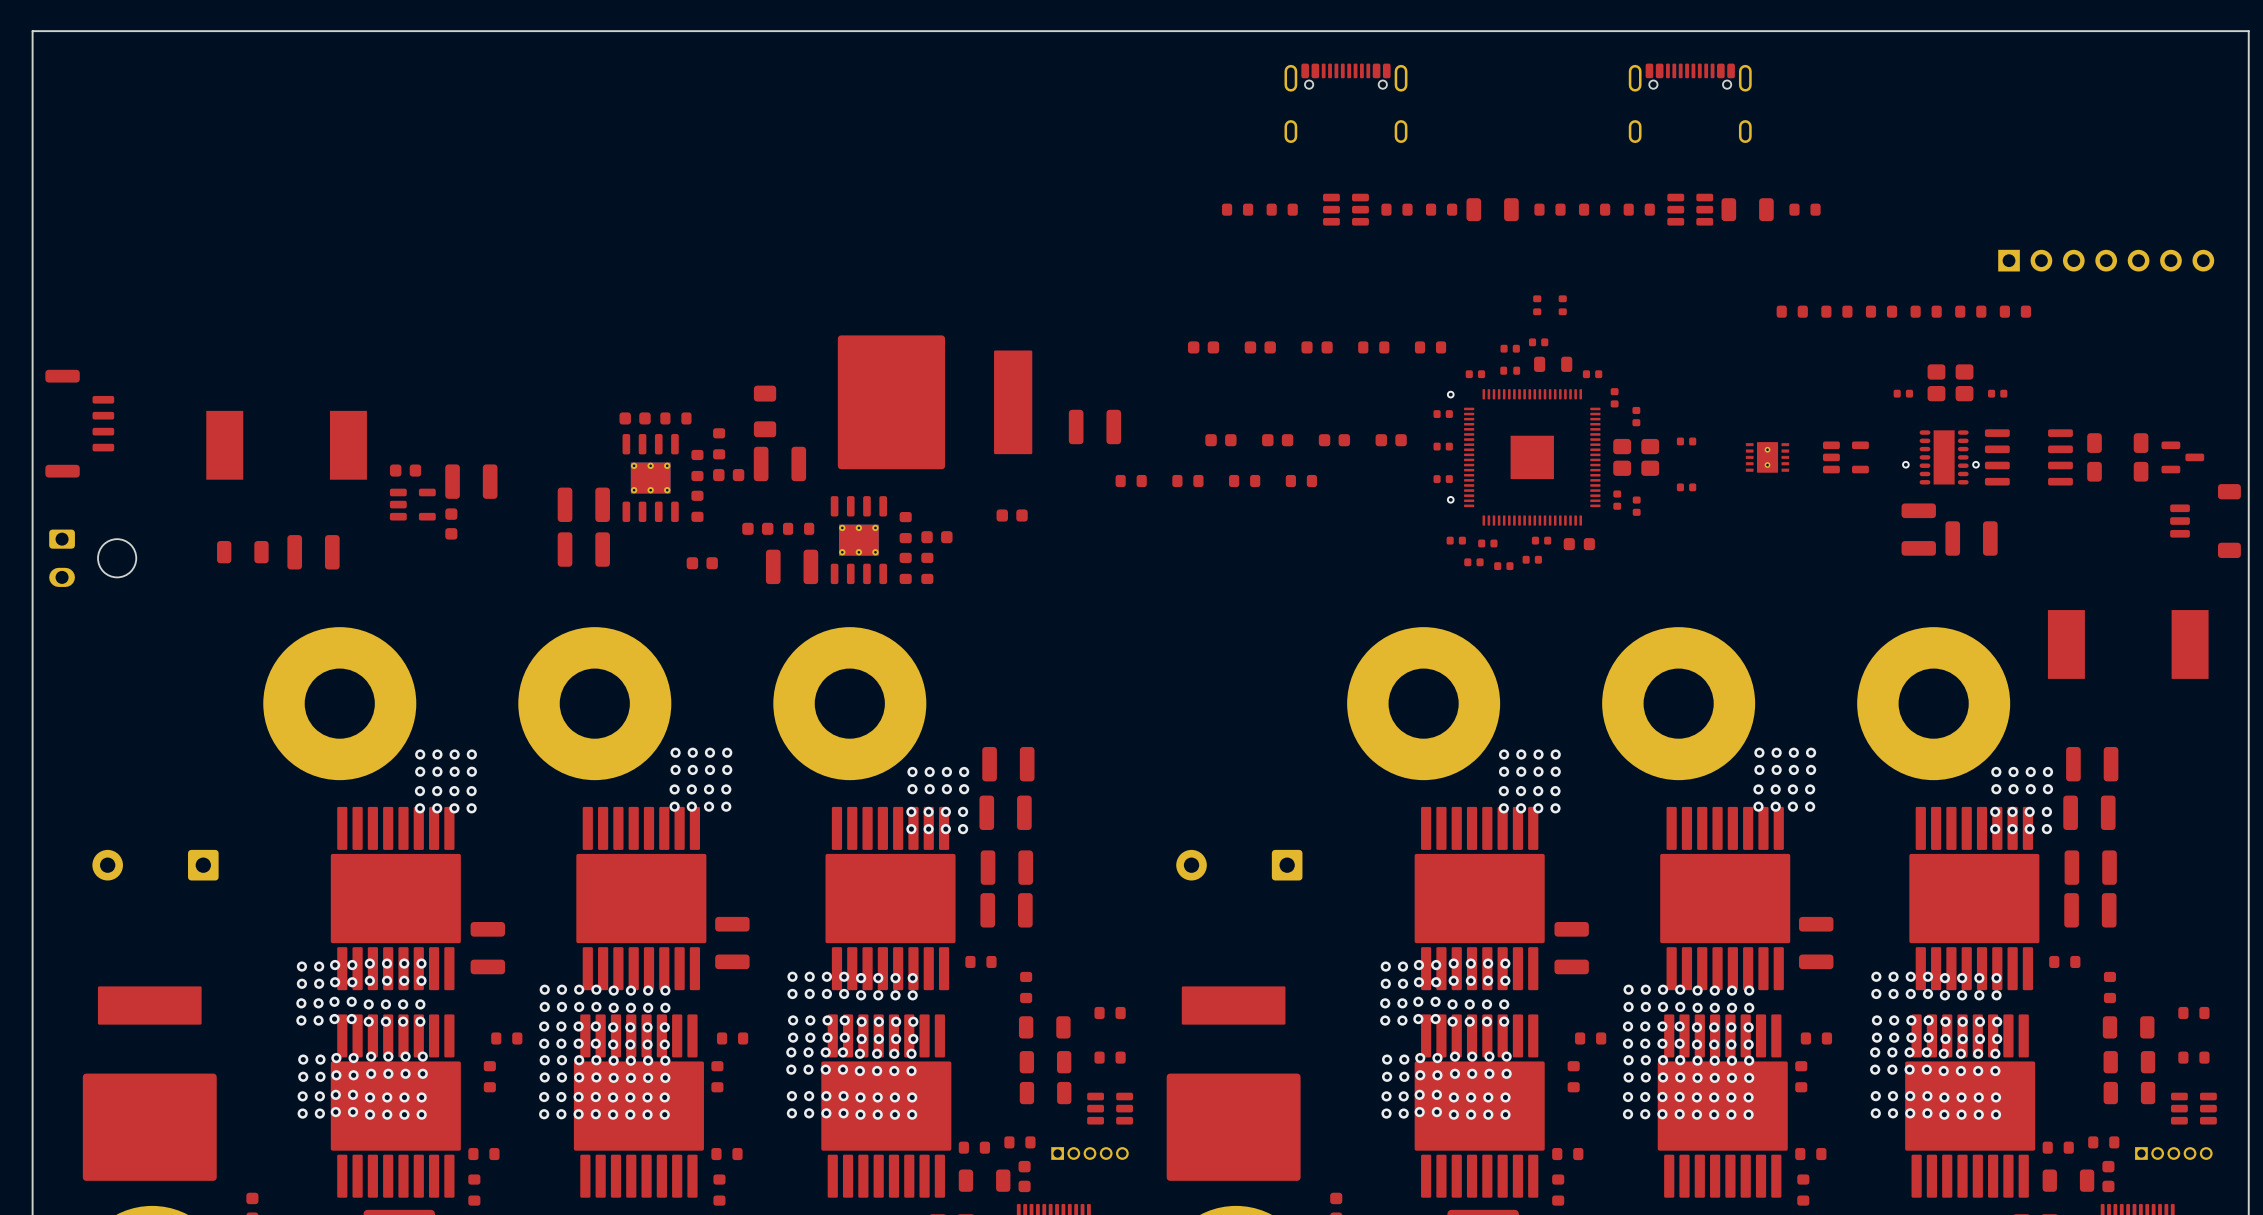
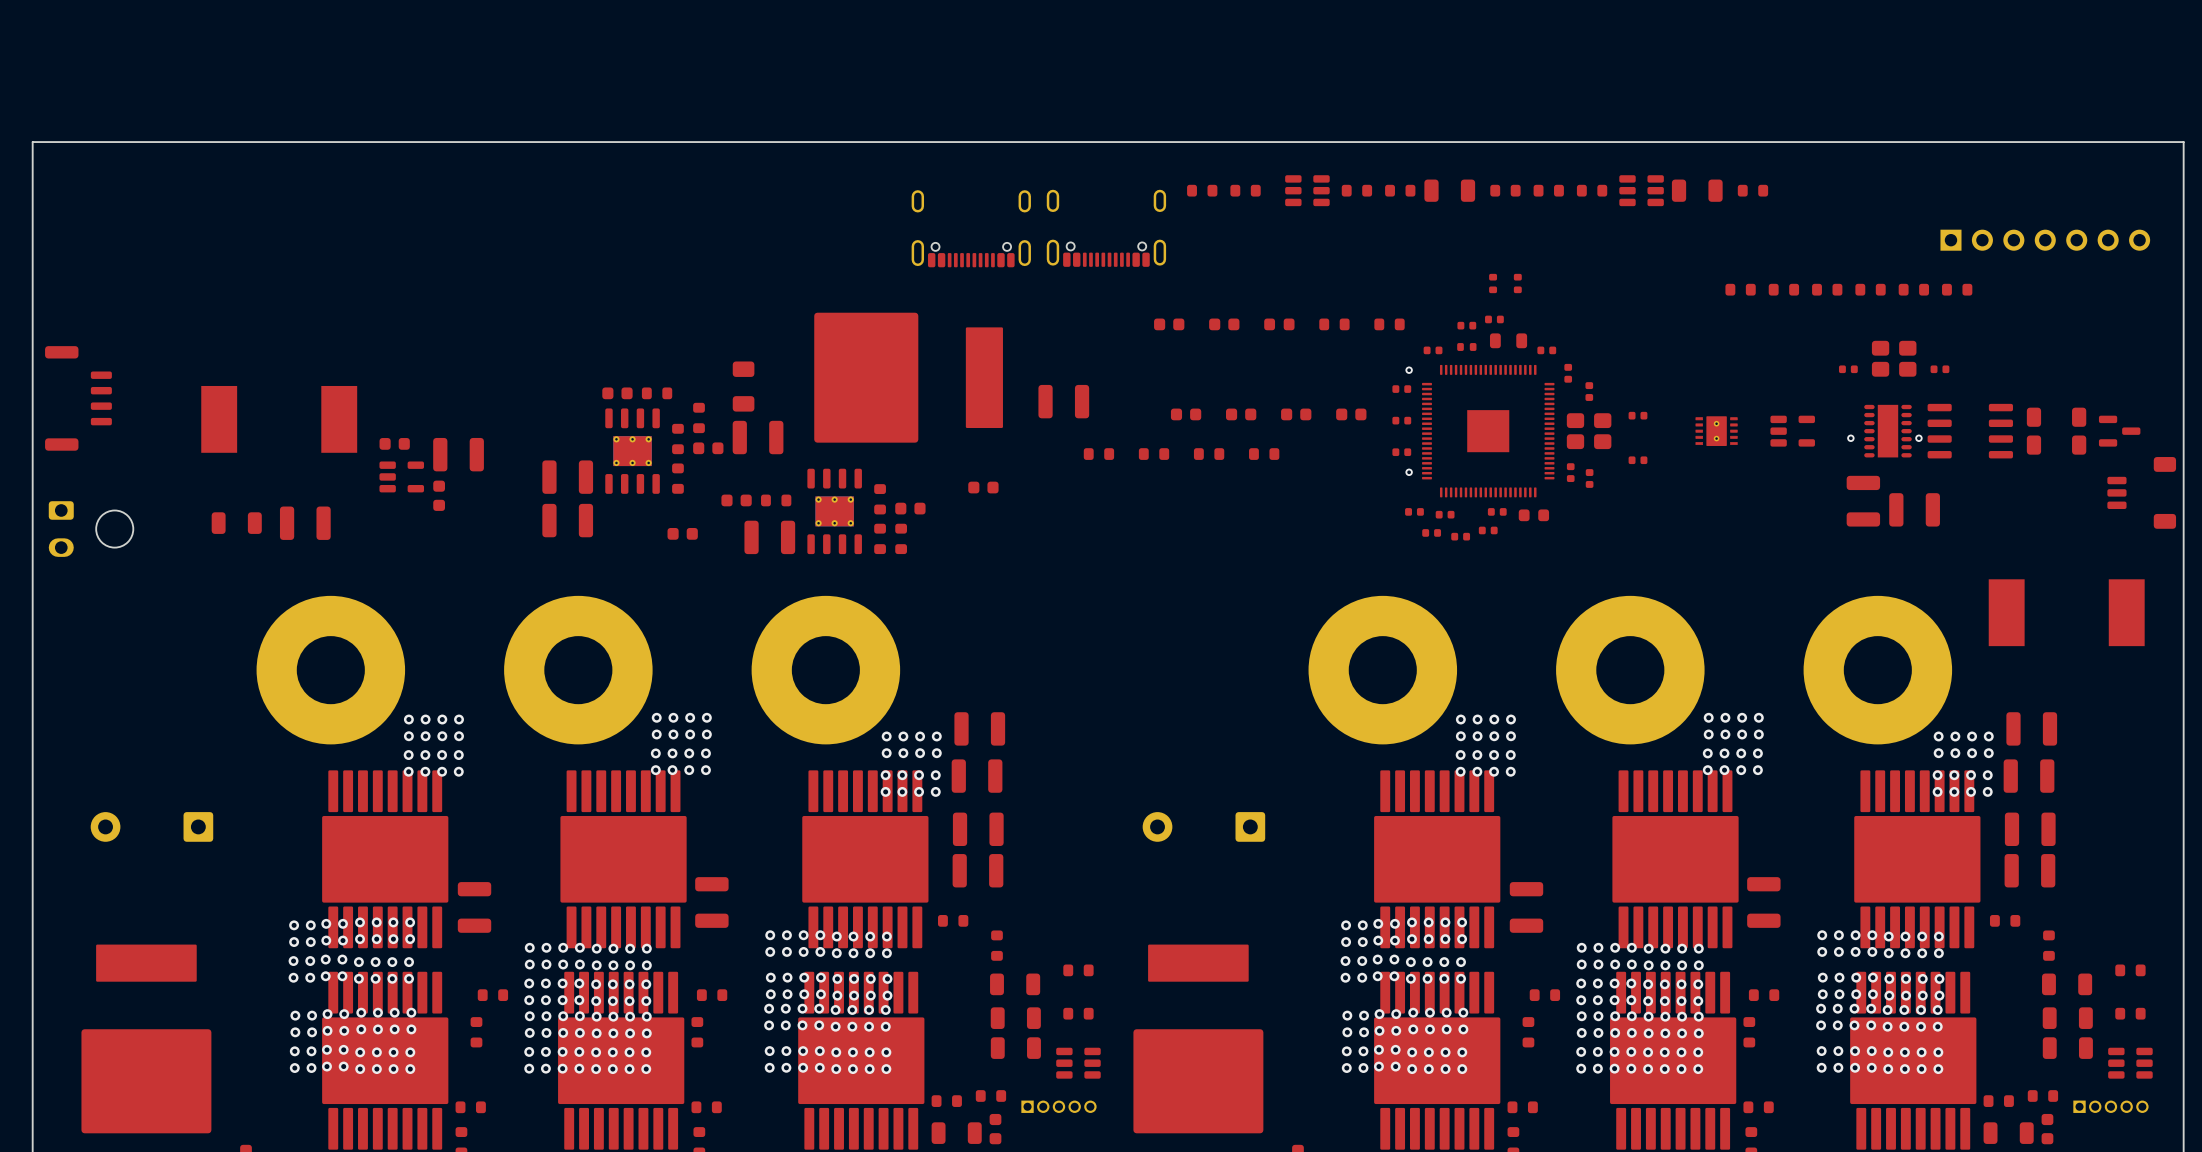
part: (1345, 103) -> none
part: (1690, 103) -> none
board edge: (32, 159) (32, 31) (2248, 31) (2248, 159) -> (32, 142) (2183, 142)
part: none -> (971, 228)
part: none -> (1106, 228)

